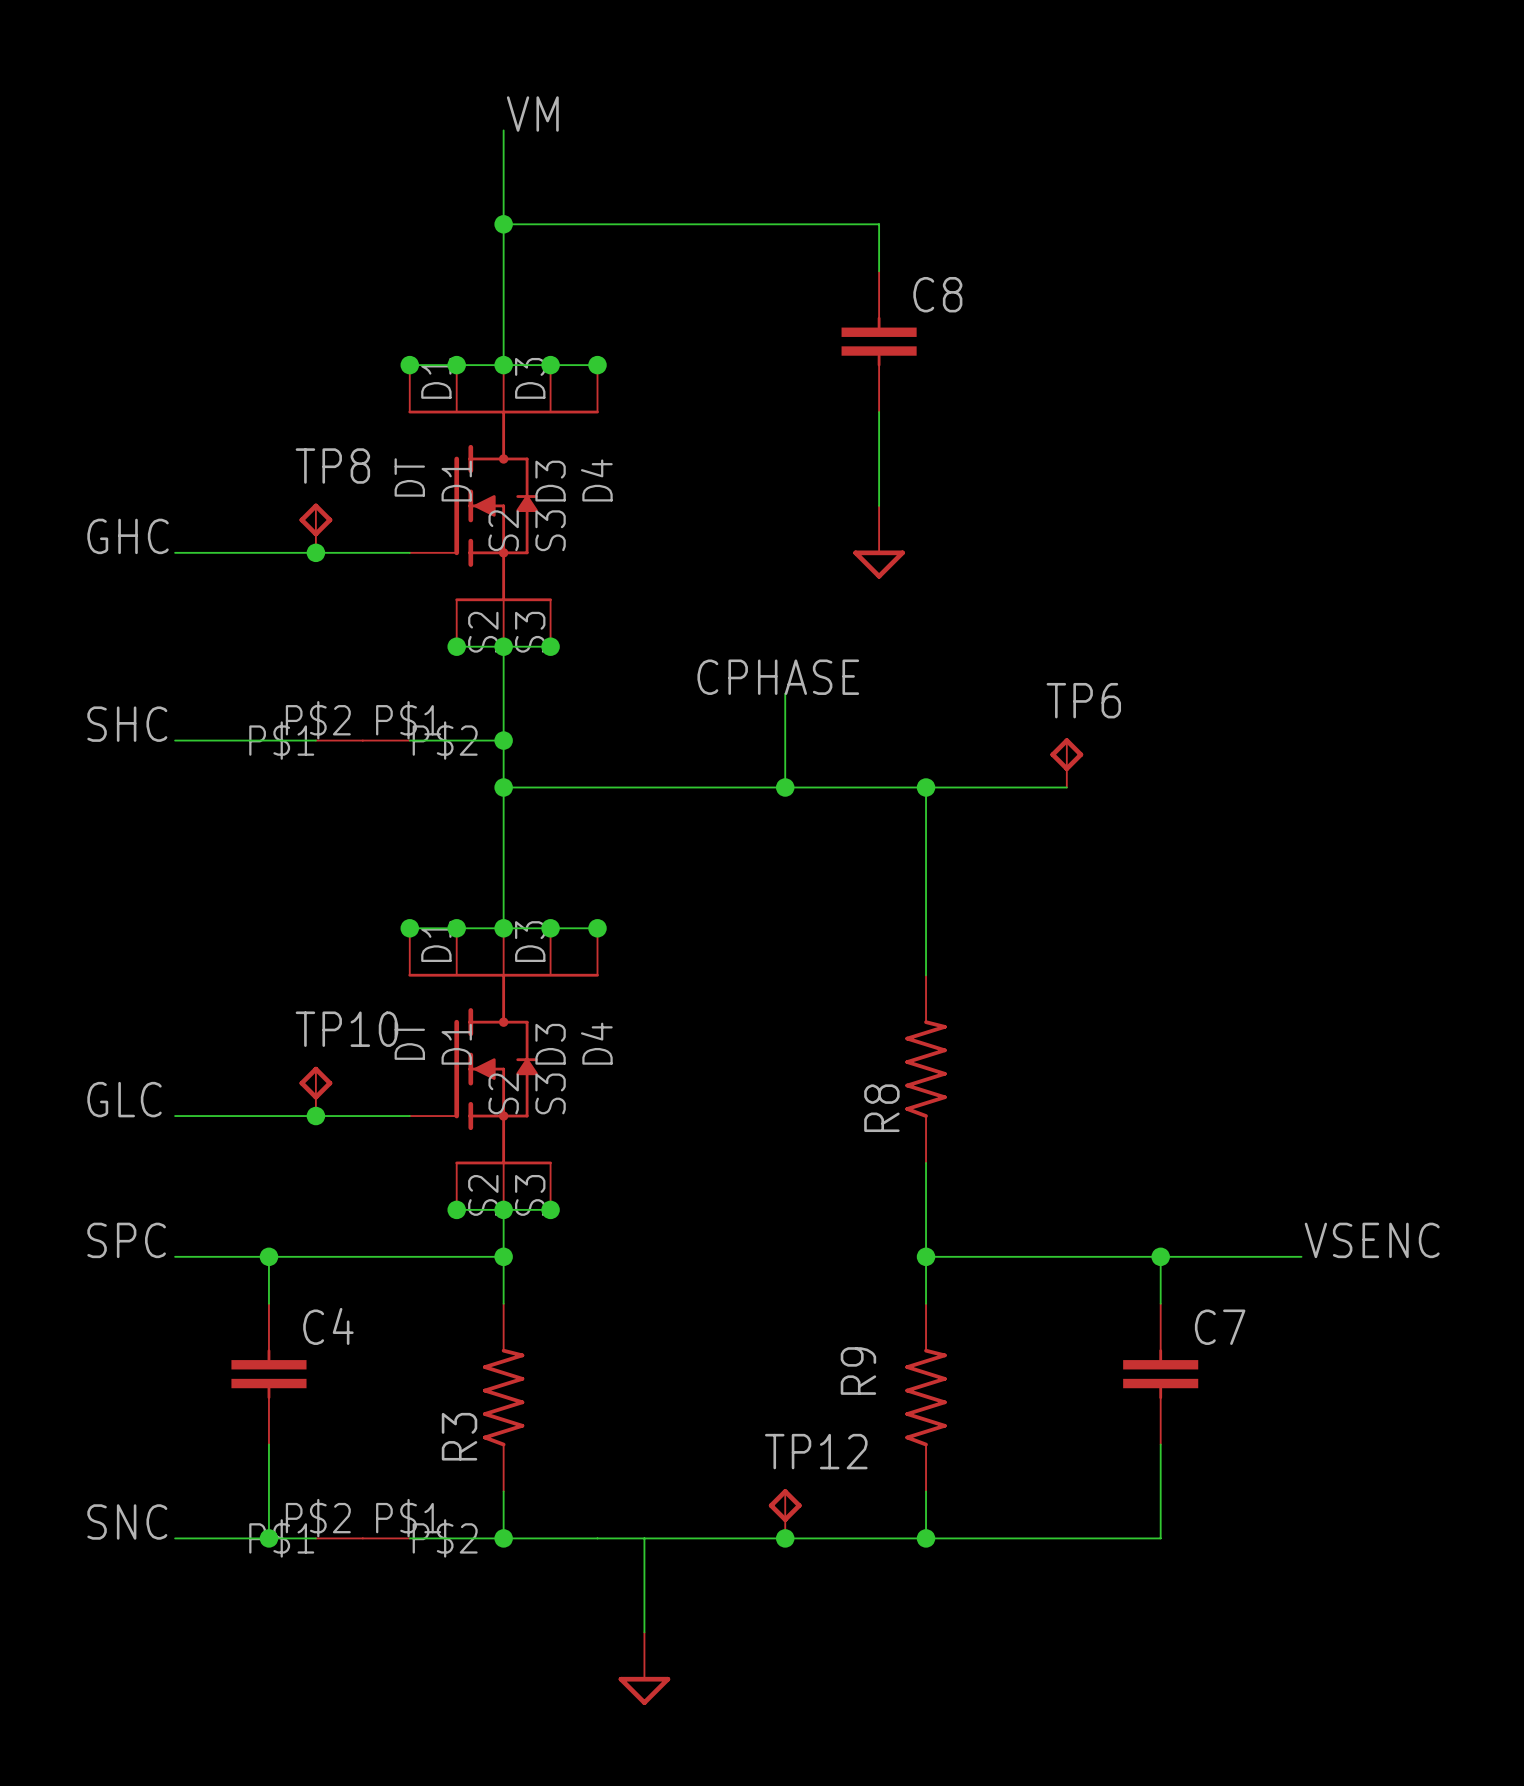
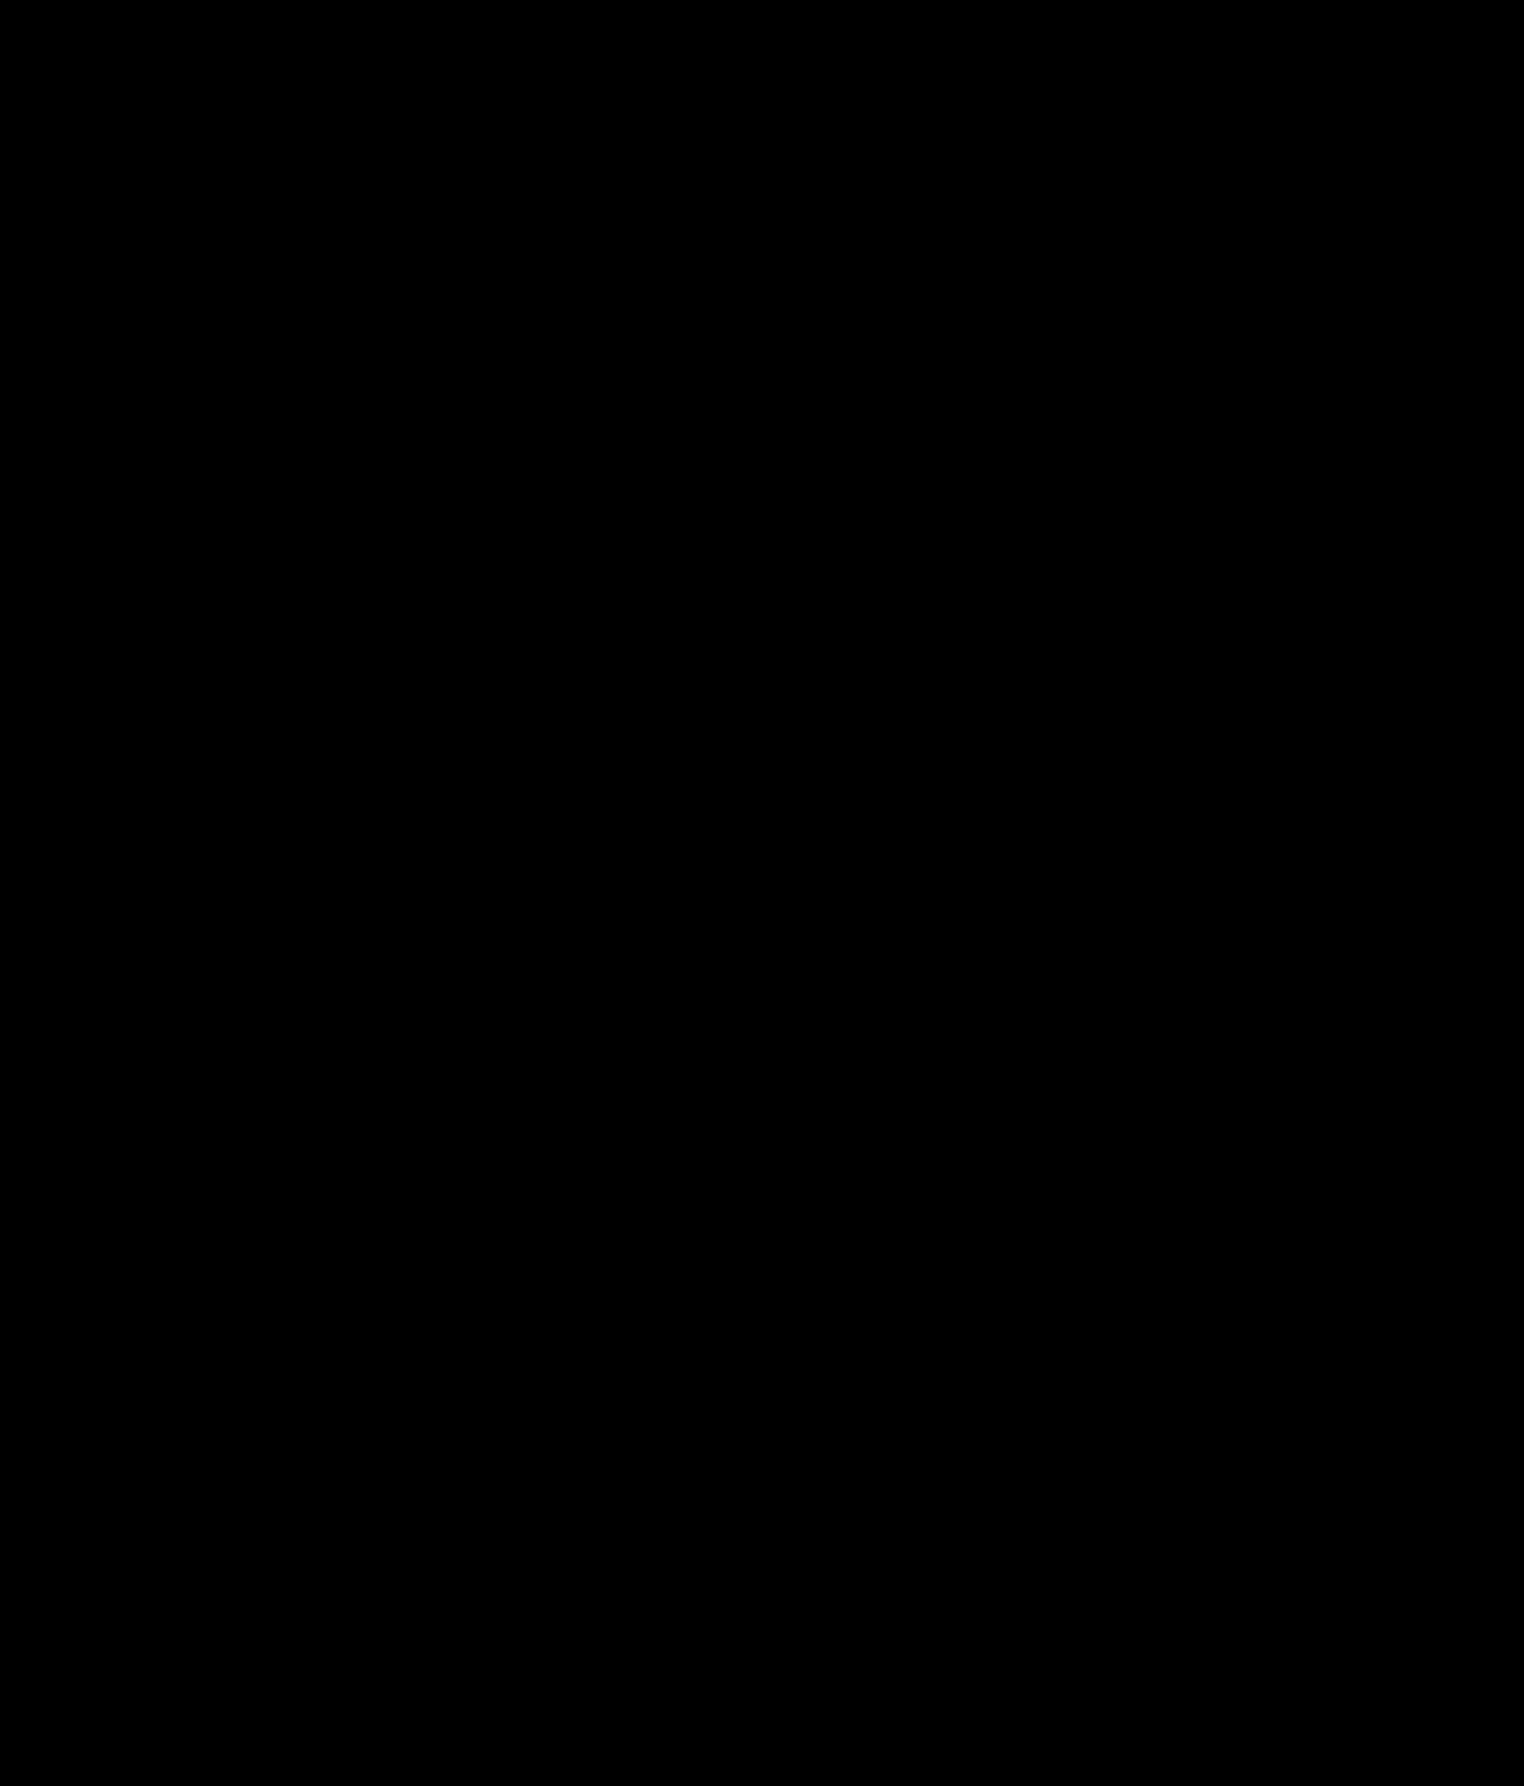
label: VM (532, 114) -> none
wire: (503, 130) (503, 365) -> none
wire: (503, 224) (879, 224) (879, 271) -> none
junction: (503, 224) -> none
C8: (879, 341) -> none
wire: (409, 365) (597, 365) -> none
junction: (409, 365) -> none
junction: (456, 365) -> none
junction: (503, 365) -> none
junction: (550, 365) -> none
junction: (597, 365) -> none
wire: (879, 412) (879, 505) -> none
part: (503, 505) -> none
TP8: (315, 528) -> none
label: GHC (128, 536) -> none
power symbol: (879, 542) -> none
wire: (175, 552) (409, 552) -> none
junction: (315, 552) -> none
wire: (456, 646) (550, 646) -> none
junction: (456, 646) -> none
wire: (503, 646) (503, 928) -> none
junction: (503, 646) -> none
junction: (550, 646) -> none
label: CPHASE (778, 677) -> none
wire: (785, 693) (785, 787) -> none
label: SHC (127, 724) -> none
wire: (175, 740) (315, 740) -> none
part: (362, 740) -> none
wire: (409, 740) (503, 740) -> none
junction: (503, 740) -> none
TP6: (1066, 762) -> none
wire: (503, 787) (1066, 787) -> none
junction: (503, 787) -> none
junction: (785, 787) -> none
wire: (926, 787) (926, 975) -> none
junction: (926, 787) -> none
wire: (409, 928) (597, 928) -> none
junction: (409, 928) -> none
junction: (456, 928) -> none
junction: (503, 928) -> none
junction: (550, 928) -> none
junction: (597, 928) -> none
part: (503, 1069) -> none
R8: (926, 1069) -> none
TP10: (315, 1091) -> none
label: GLC (124, 1099) -> none
wire: (175, 1116) (409, 1116) -> none
junction: (315, 1116) -> none
wire: (926, 1162) (926, 1303) -> none
wire: (456, 1209) (550, 1209) -> none
junction: (456, 1209) -> none
wire: (503, 1209) (503, 1303) -> none
junction: (503, 1209) -> none
junction: (550, 1209) -> none
label: SPC (126, 1240) -> none
label: VSENC (1372, 1240) -> none
wire: (175, 1256) (503, 1256) -> none
wire: (268, 1256) (268, 1303) -> none
junction: (268, 1256) -> none
junction: (503, 1256) -> none
wire: (926, 1256) (1301, 1256) -> none
junction: (926, 1256) -> none
wire: (1160, 1256) (1160, 1303) -> none
junction: (1160, 1256) -> none
C4: (268, 1374) -> none
C7: (1160, 1374) -> none
R3: (503, 1397) -> none
R9: (926, 1397) -> none
wire: (268, 1444) (268, 1538) -> none
wire: (1160, 1444) (1160, 1538) (409, 1538) -> none
wire: (503, 1491) (503, 1538) -> none
wire: (926, 1491) (926, 1538) -> none
TP12: (785, 1513) -> none
label: SNC (127, 1521) -> none
wire: (175, 1538) (315, 1538) -> none
junction: (268, 1538) -> none
part: (362, 1538) -> none
junction: (503, 1538) -> none
wire: (644, 1538) (644, 1632) -> none
junction: (785, 1538) -> none
junction: (926, 1538) -> none
power symbol: (644, 1668) -> none

